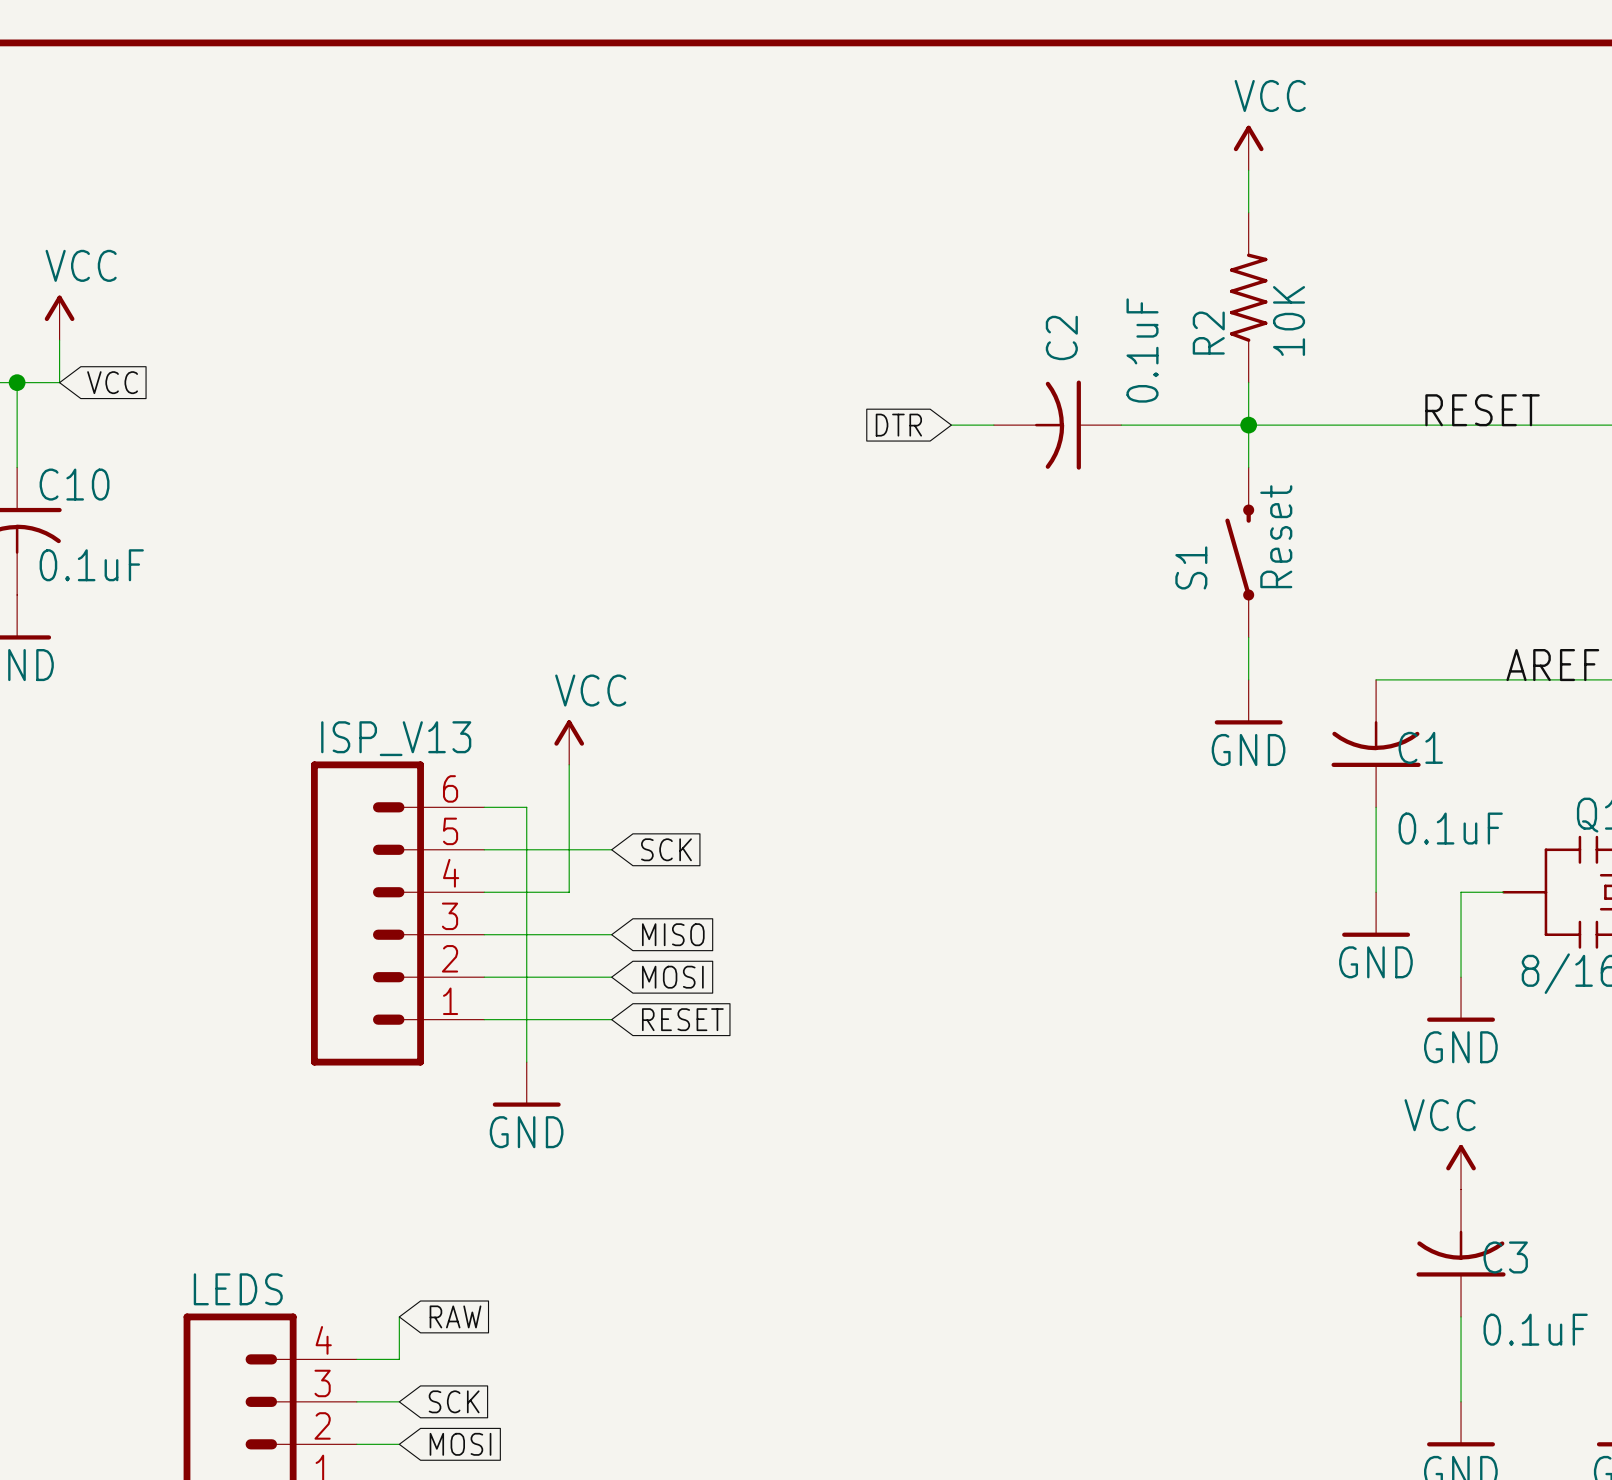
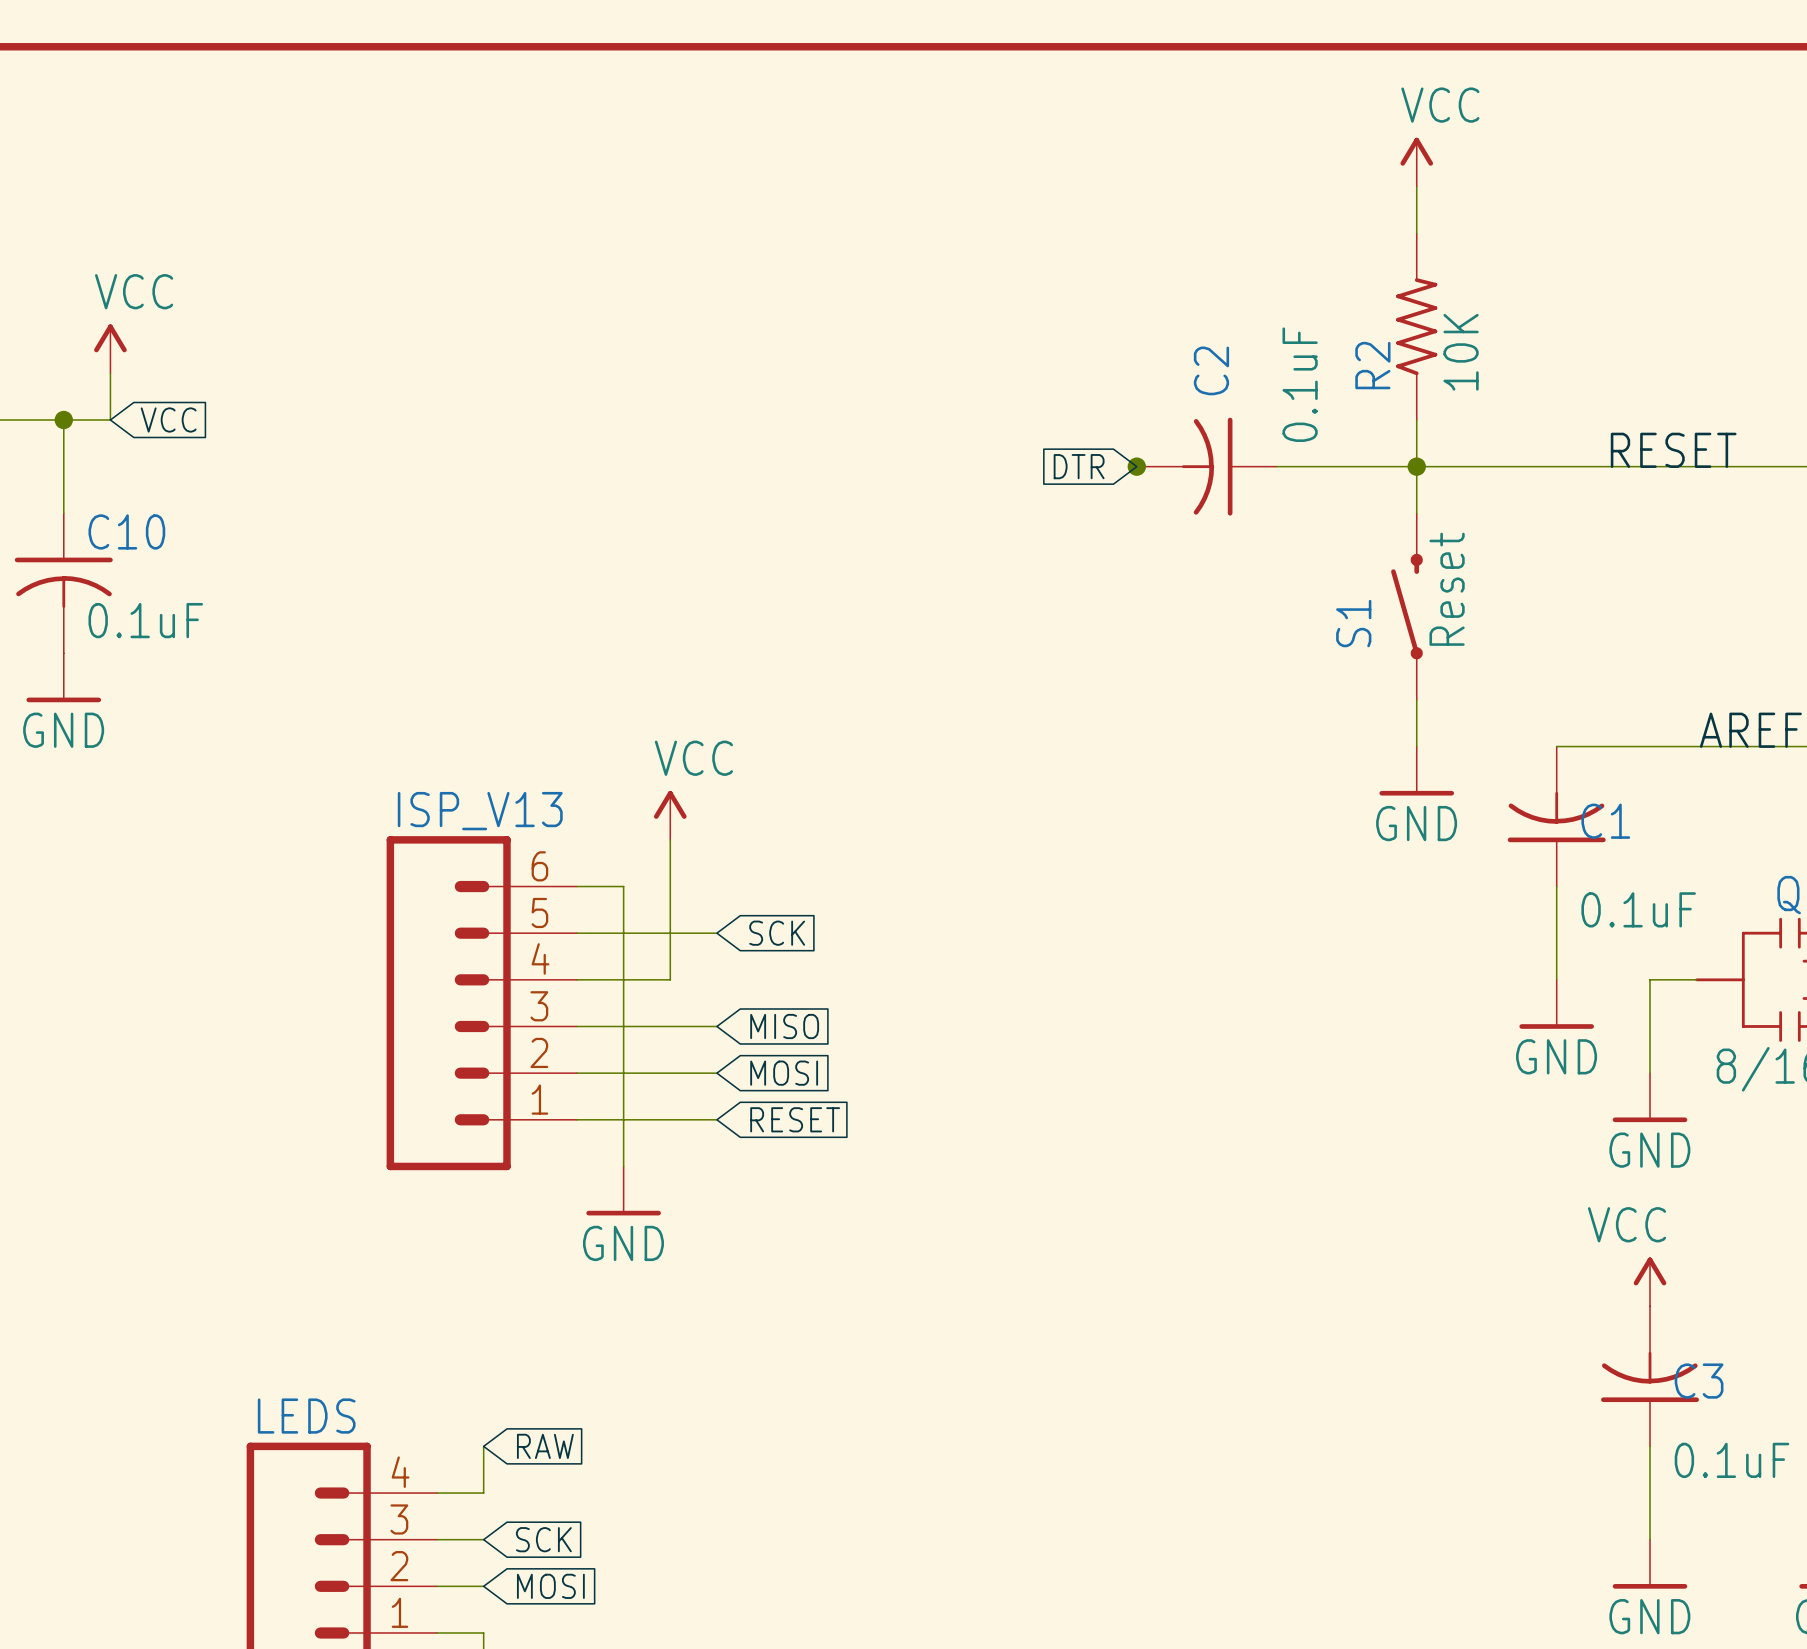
global label position: DTR (898, 425) -> DTR (1079, 466)
wire: (951, 425) (993, 425) -> none
junction: none -> (1136, 466)

